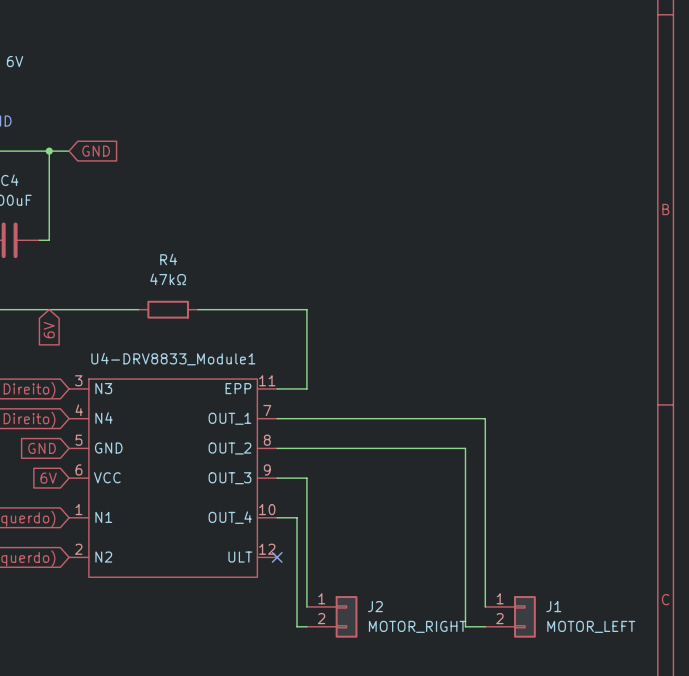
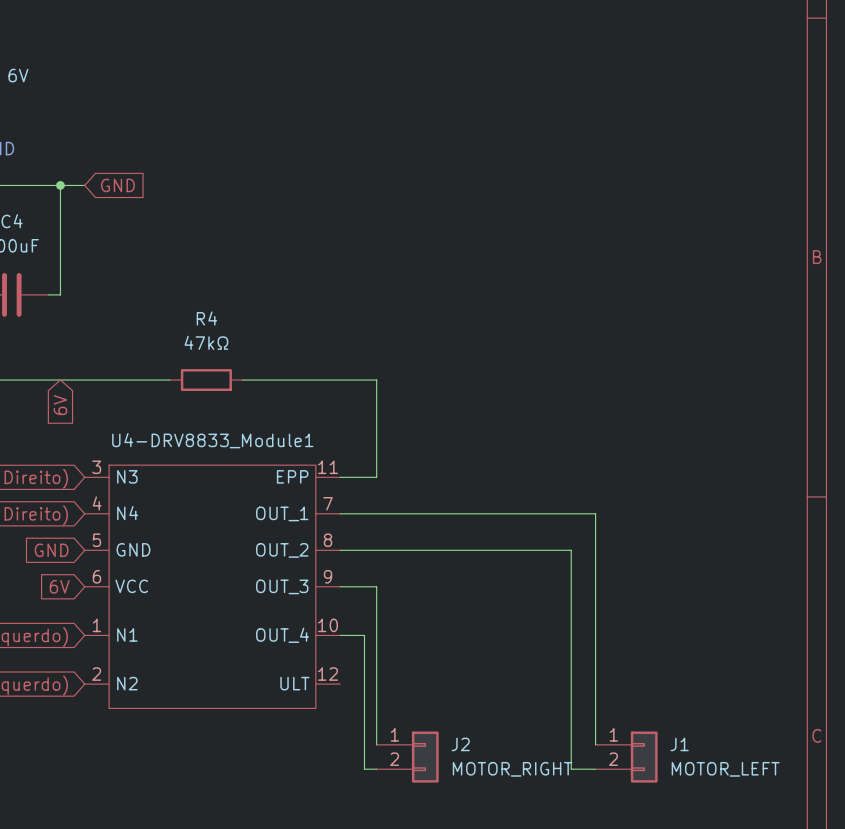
no-connect mark: (277, 557) -> none

